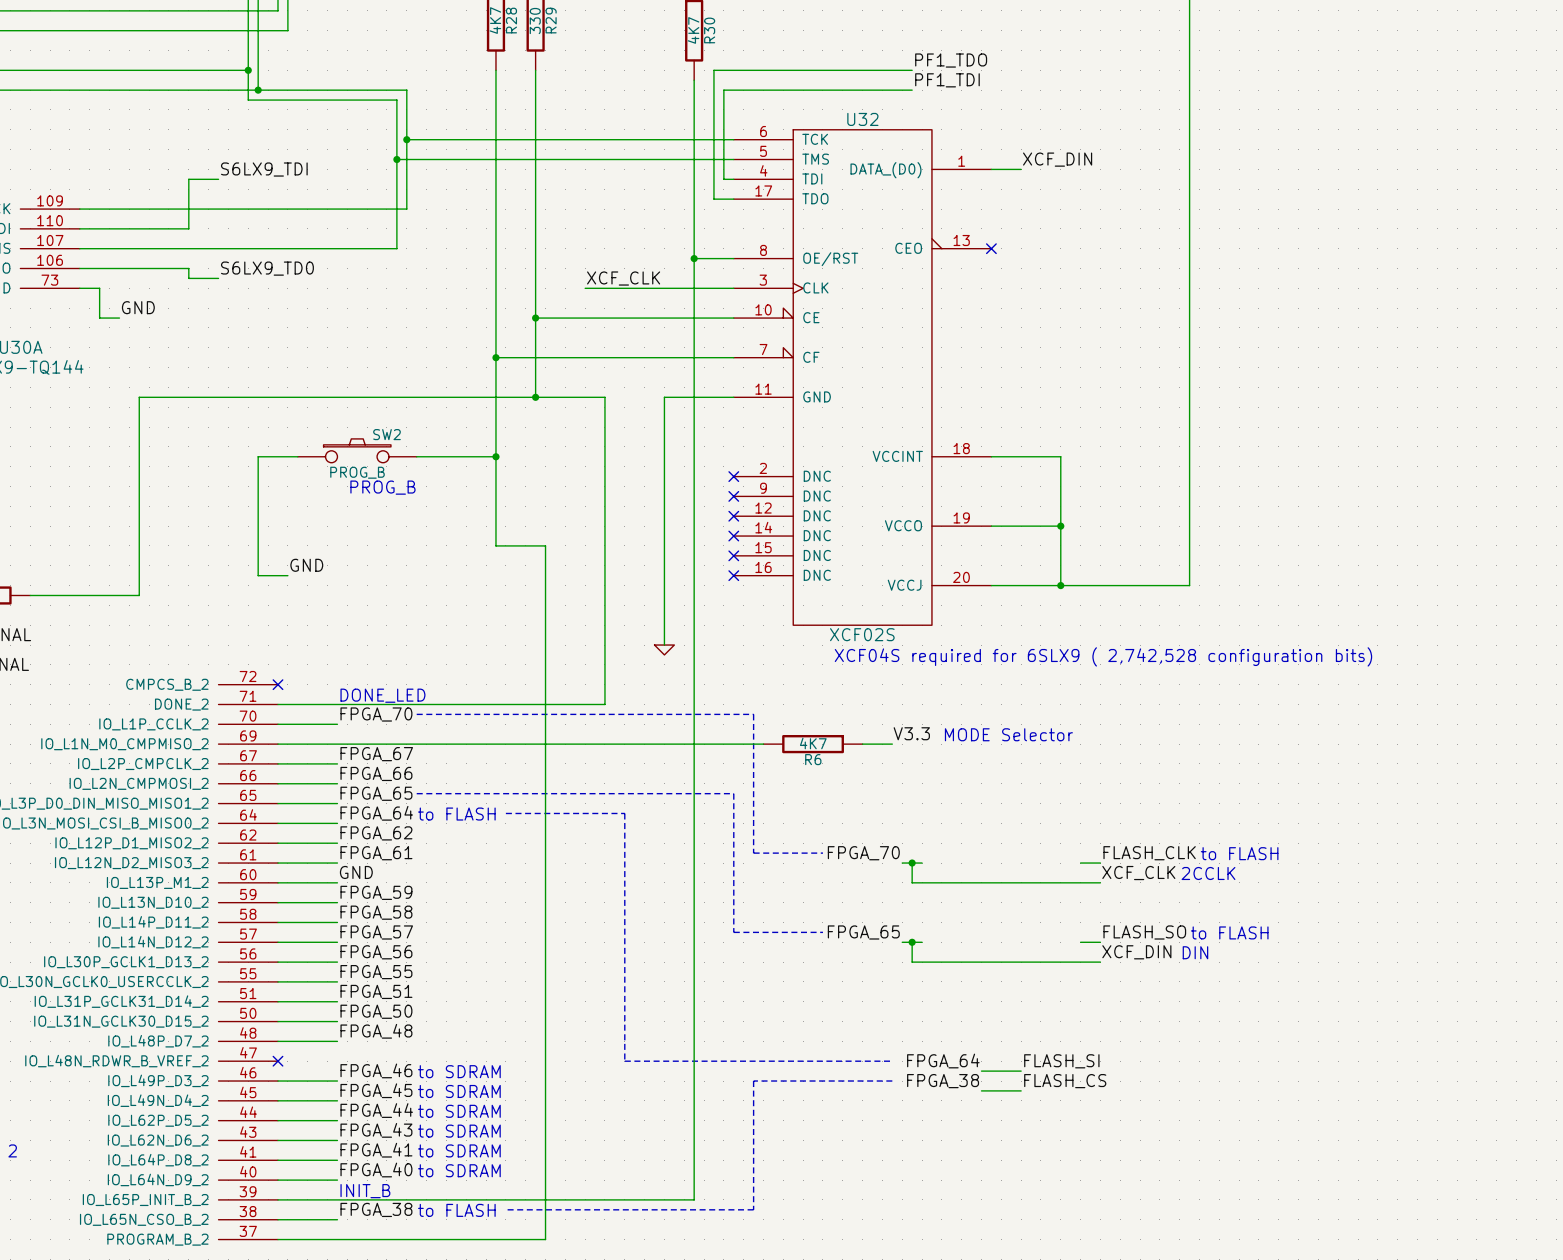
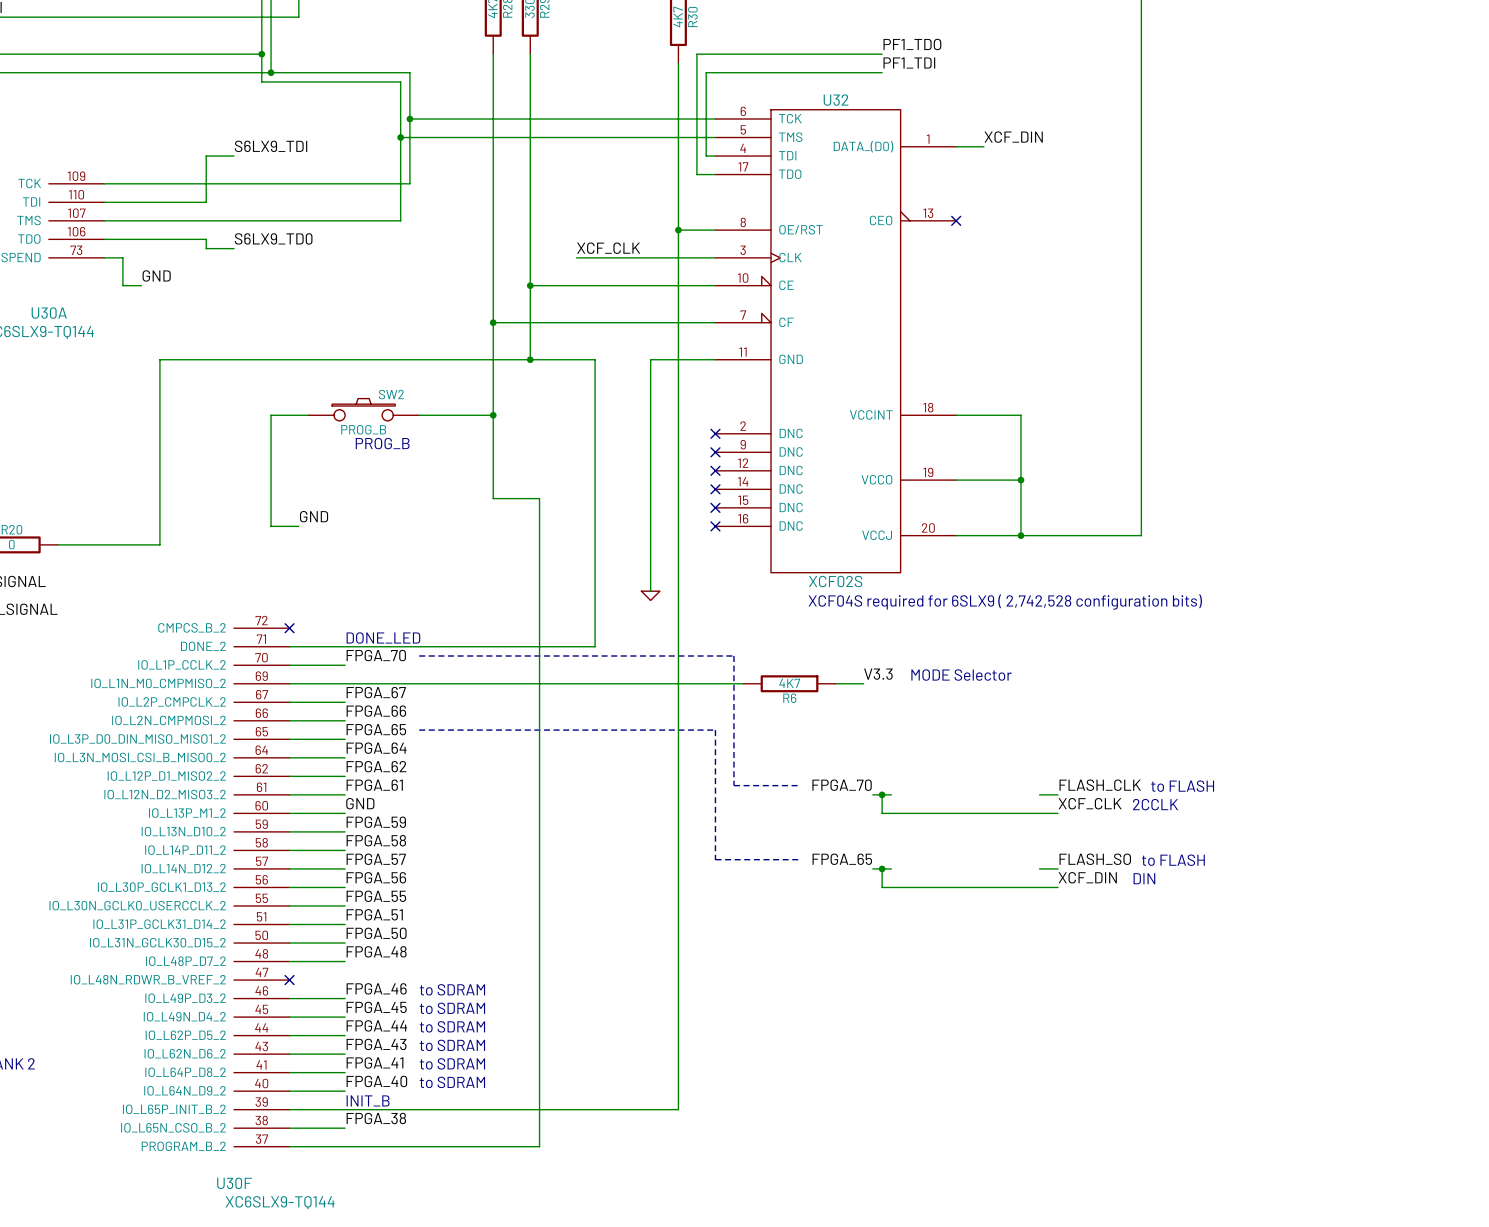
line: (505, 813) (624, 813) (624, 1061) (892, 1061) -> none
text: to FLASH (456, 814) -> none
label: FPGA_64 (943, 1061) -> none
label: FLASH_SI (1061, 1061) -> none
wire: (981, 1071) (1021, 1071) -> none
line: (892, 1081) (753, 1081) (753, 1209) (505, 1209) -> none
label: FPGA_38 (943, 1081) -> none
label: FLASH_CS (1065, 1081) -> none
wire: (981, 1090) (1021, 1090) -> none
text: to FLASH (456, 1210) -> none

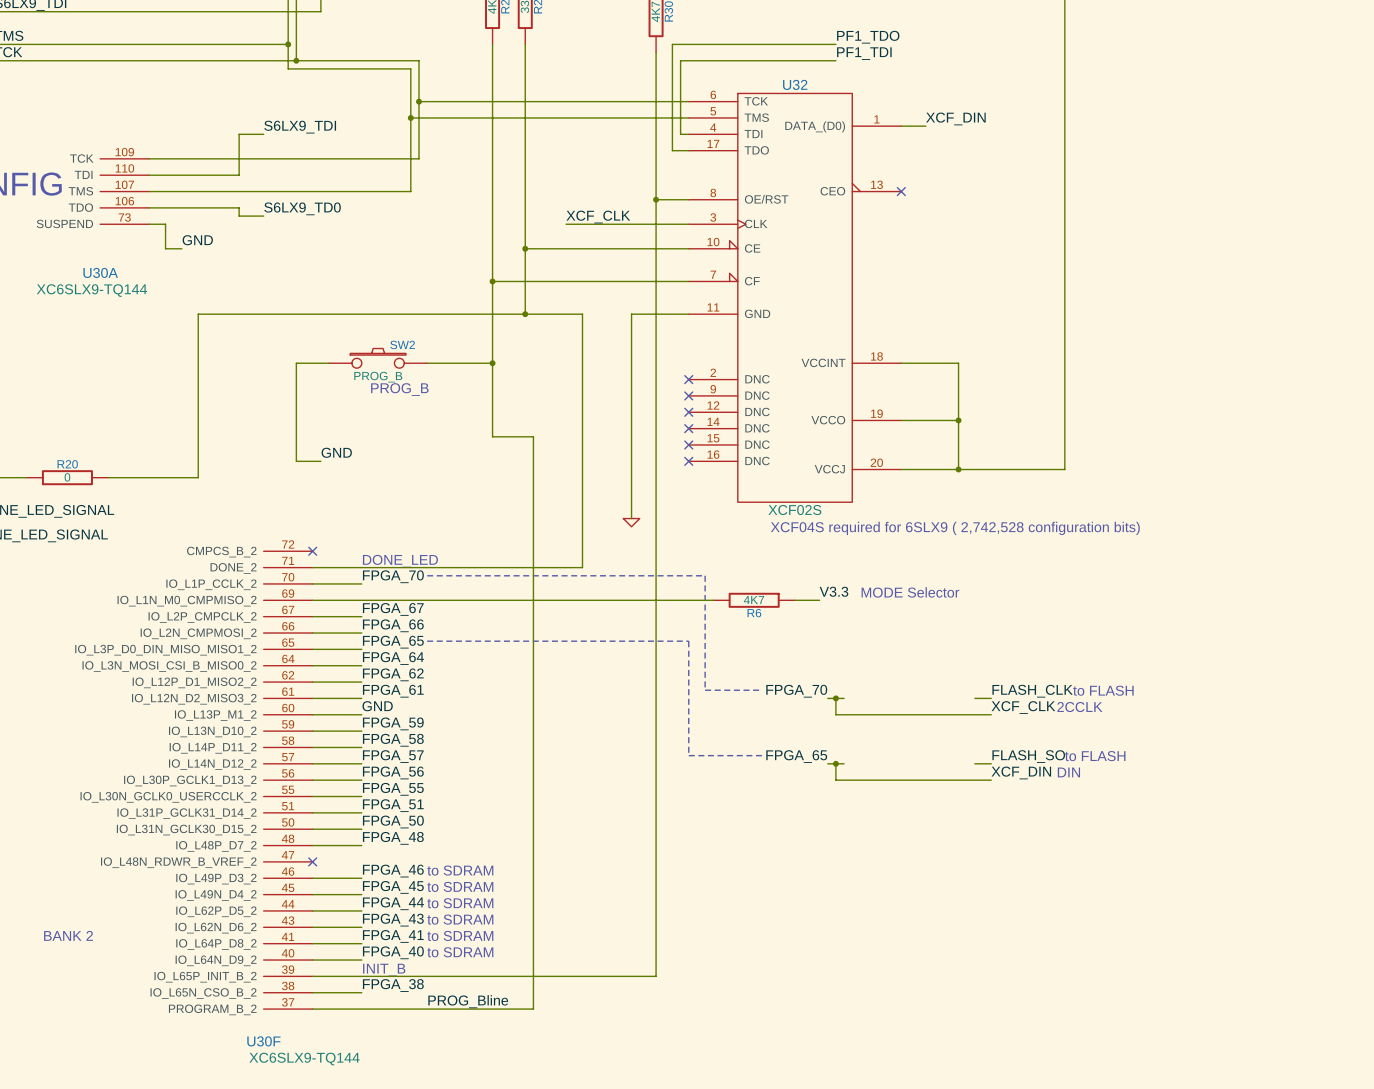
label: none -> PROG_Bline (468, 1001)

